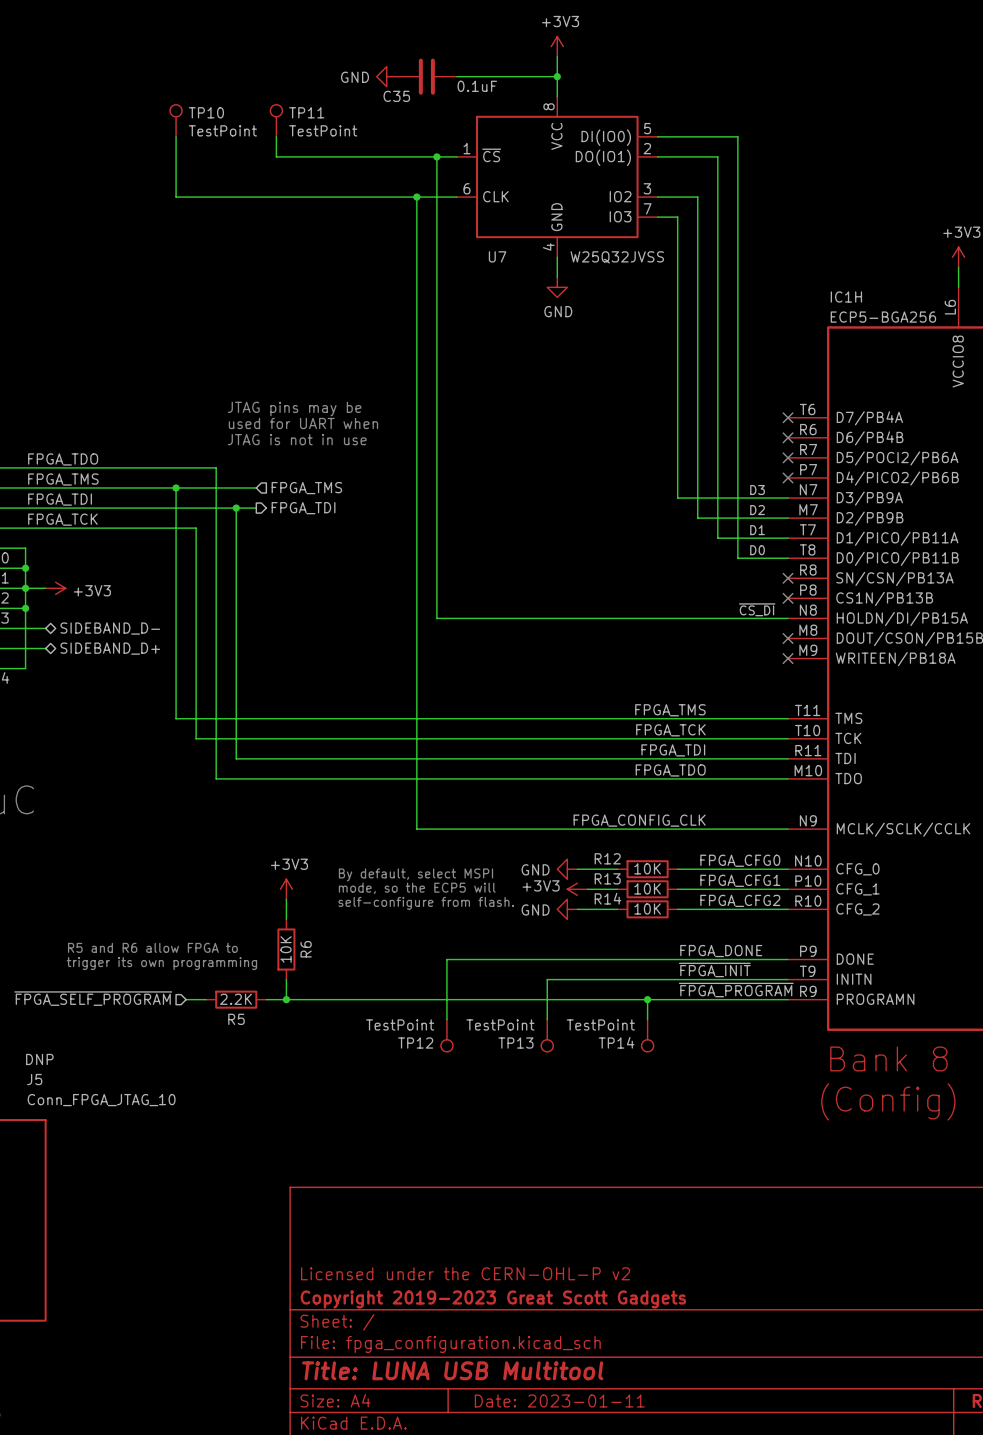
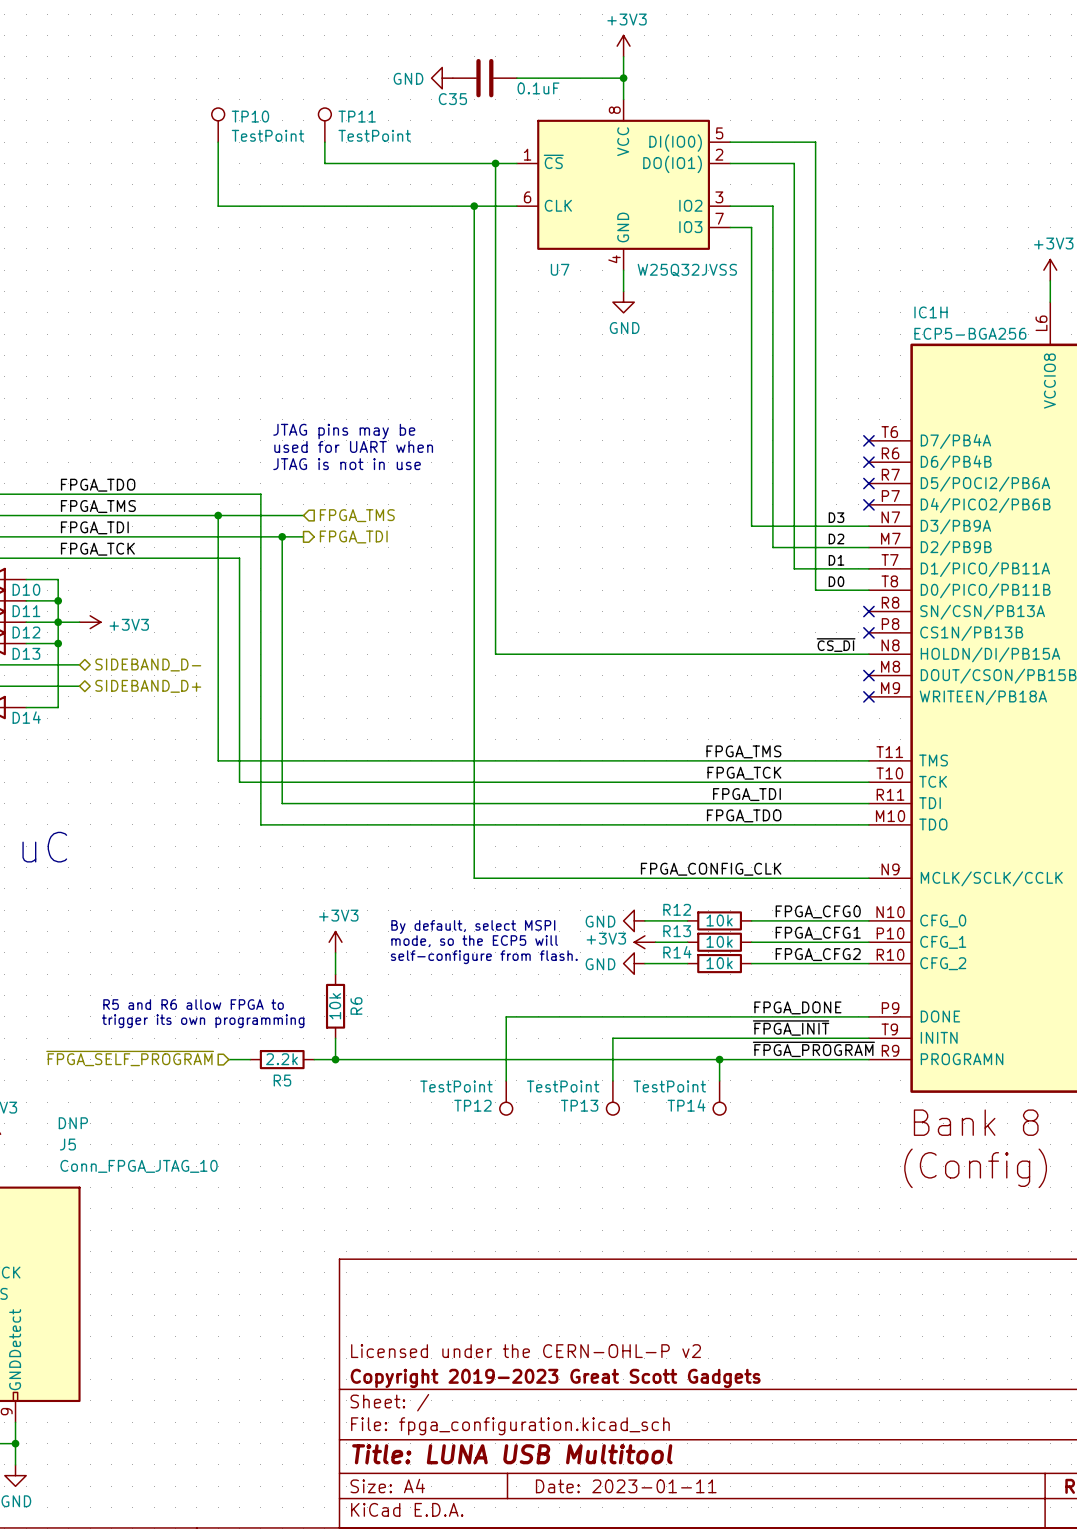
R12 value: 10K (647, 868) -> 10k (719, 920)
R13 value: 10K (647, 888) -> 10k (719, 941)
R14 value: 10K (647, 908) -> 10k (719, 963)
R6 value: 10K (286, 949) -> 10k (335, 1006)
R5 value: 2.2K (236, 999) -> 2.2k (281, 1059)

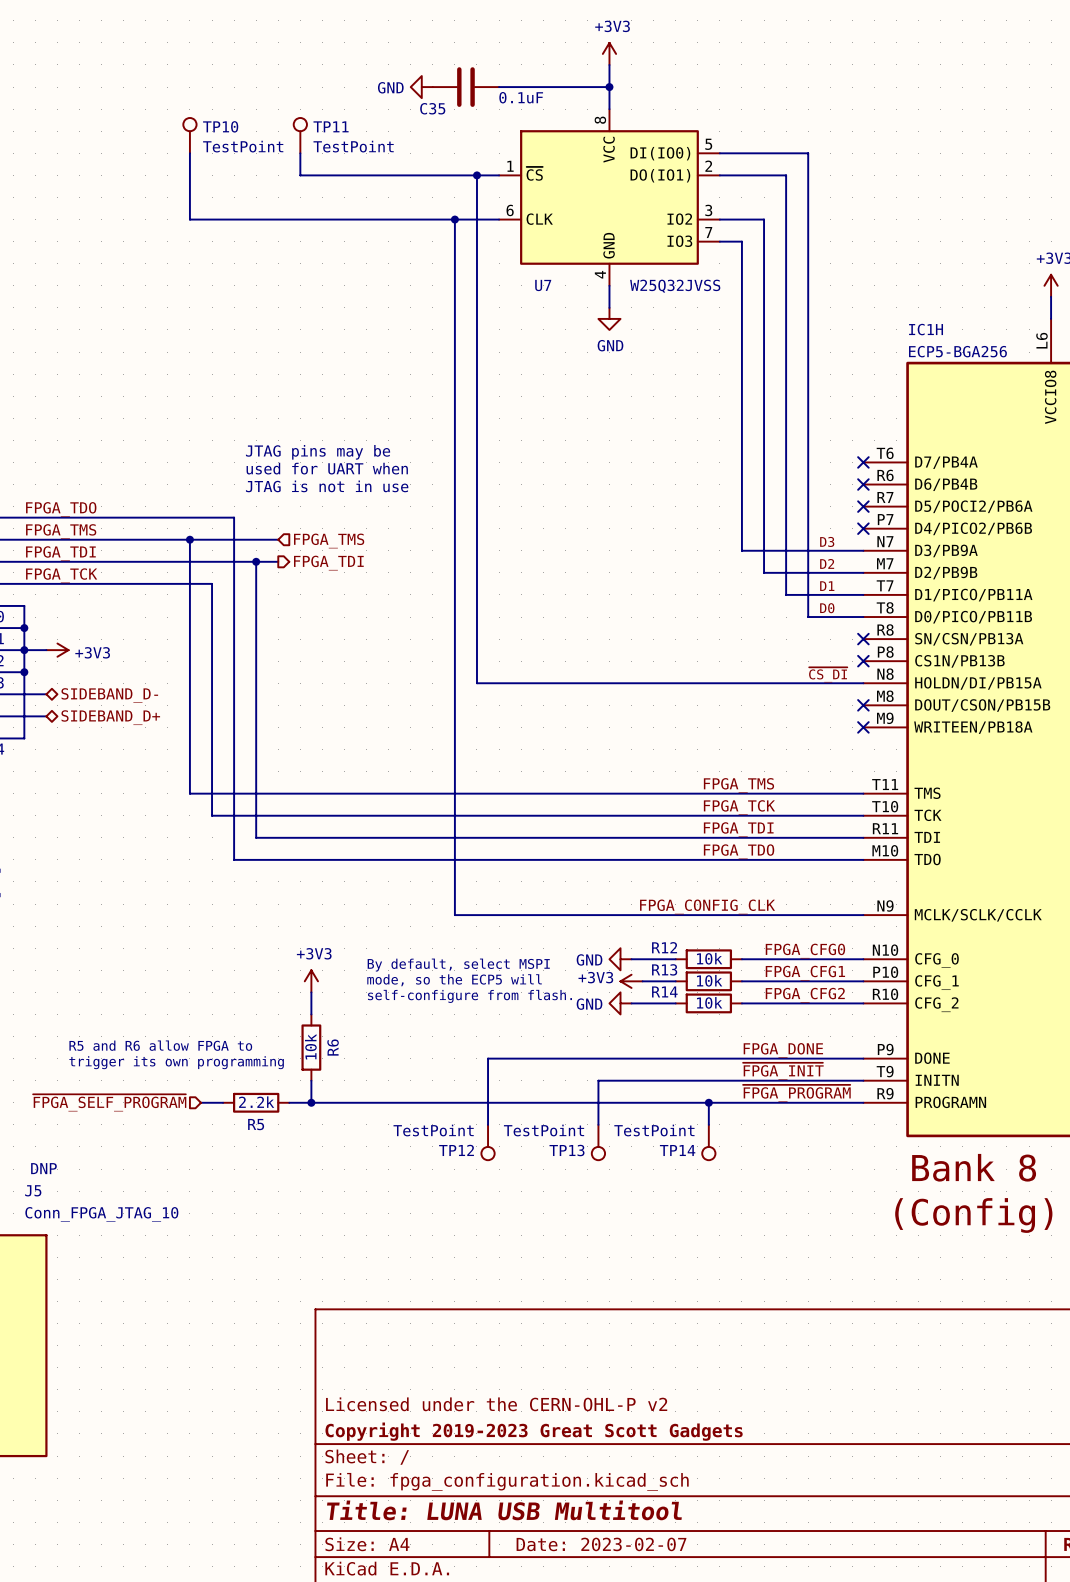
title block: Date: 2023-01-11 (626, 1486) -> Date: 2023-02-07 (601, 1544)

